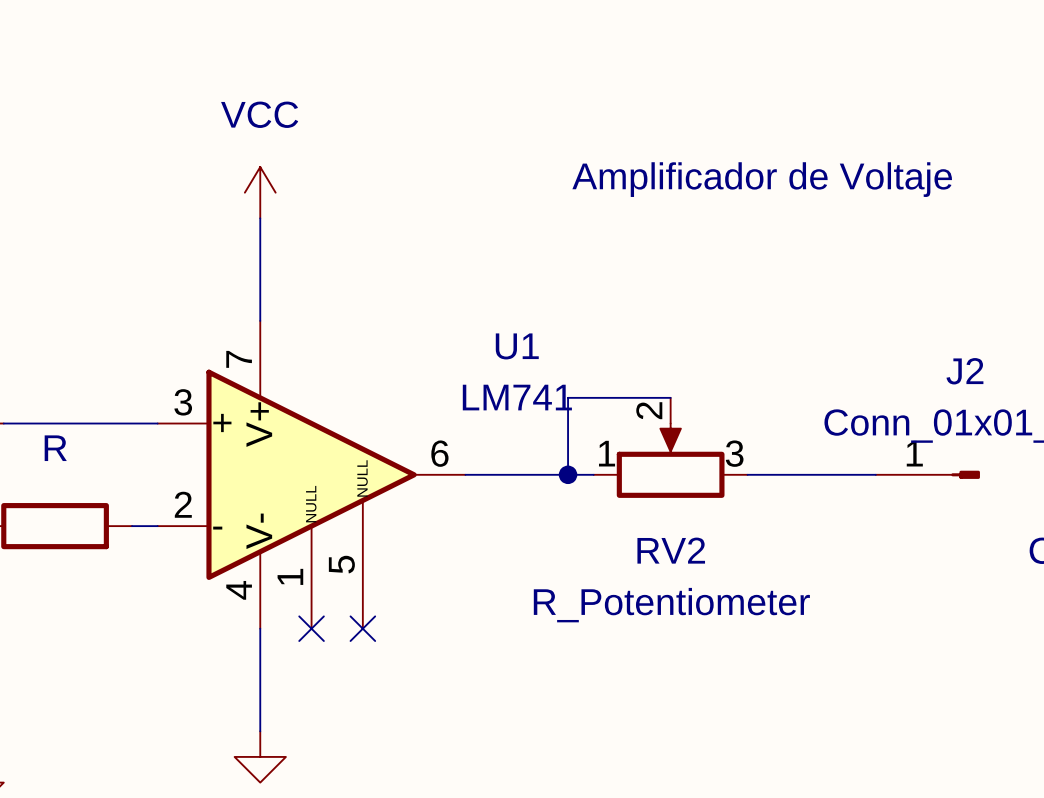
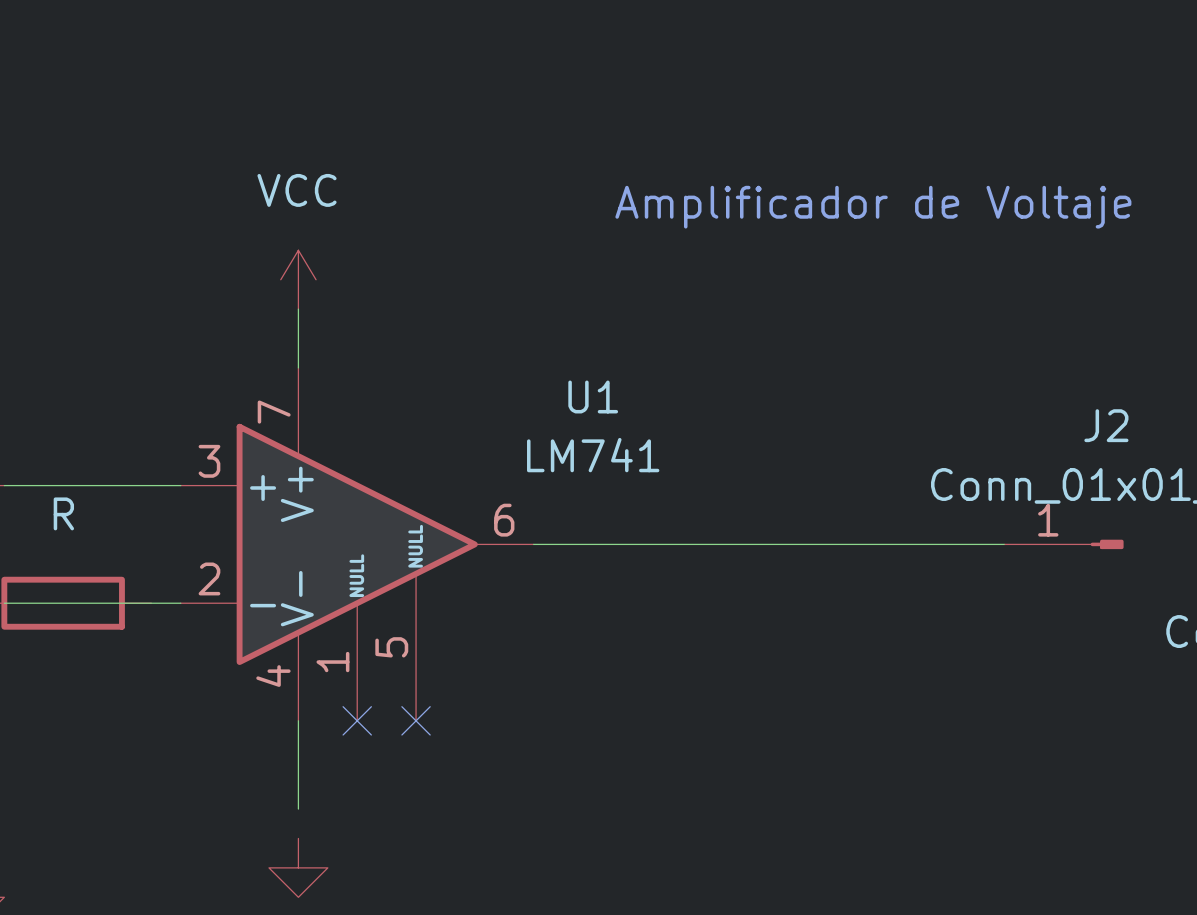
power symbol position: VCC (260, 192) -> VCC (298, 279)
wire: (670, 397) (568, 397) (568, 474) -> none
RV2: R_Potentiometer (670, 447) -> none
junction: (568, 474) -> none
wire: none -> (680, 544) (857, 544)
wire: none -> (4, 603) (151, 603)
wire: (260, 705) (260, 731) -> none

